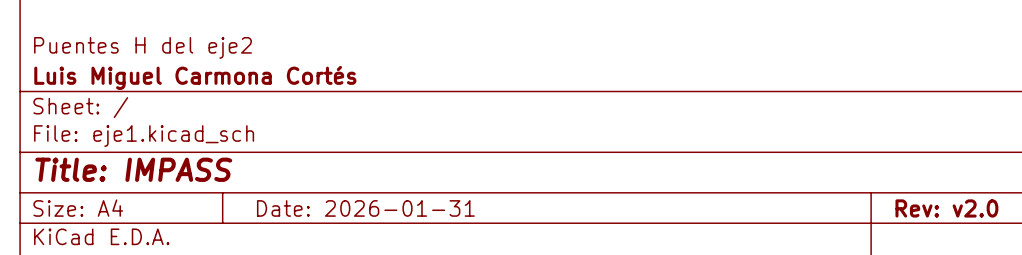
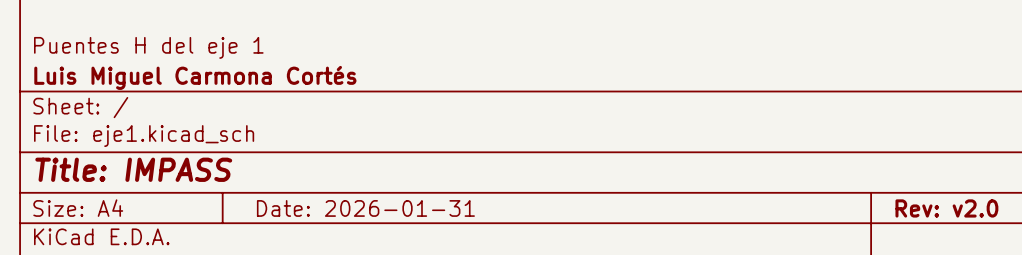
title block: Puentes H del eje2 (143, 47) -> Puentes H del eje 1 (148, 47)

